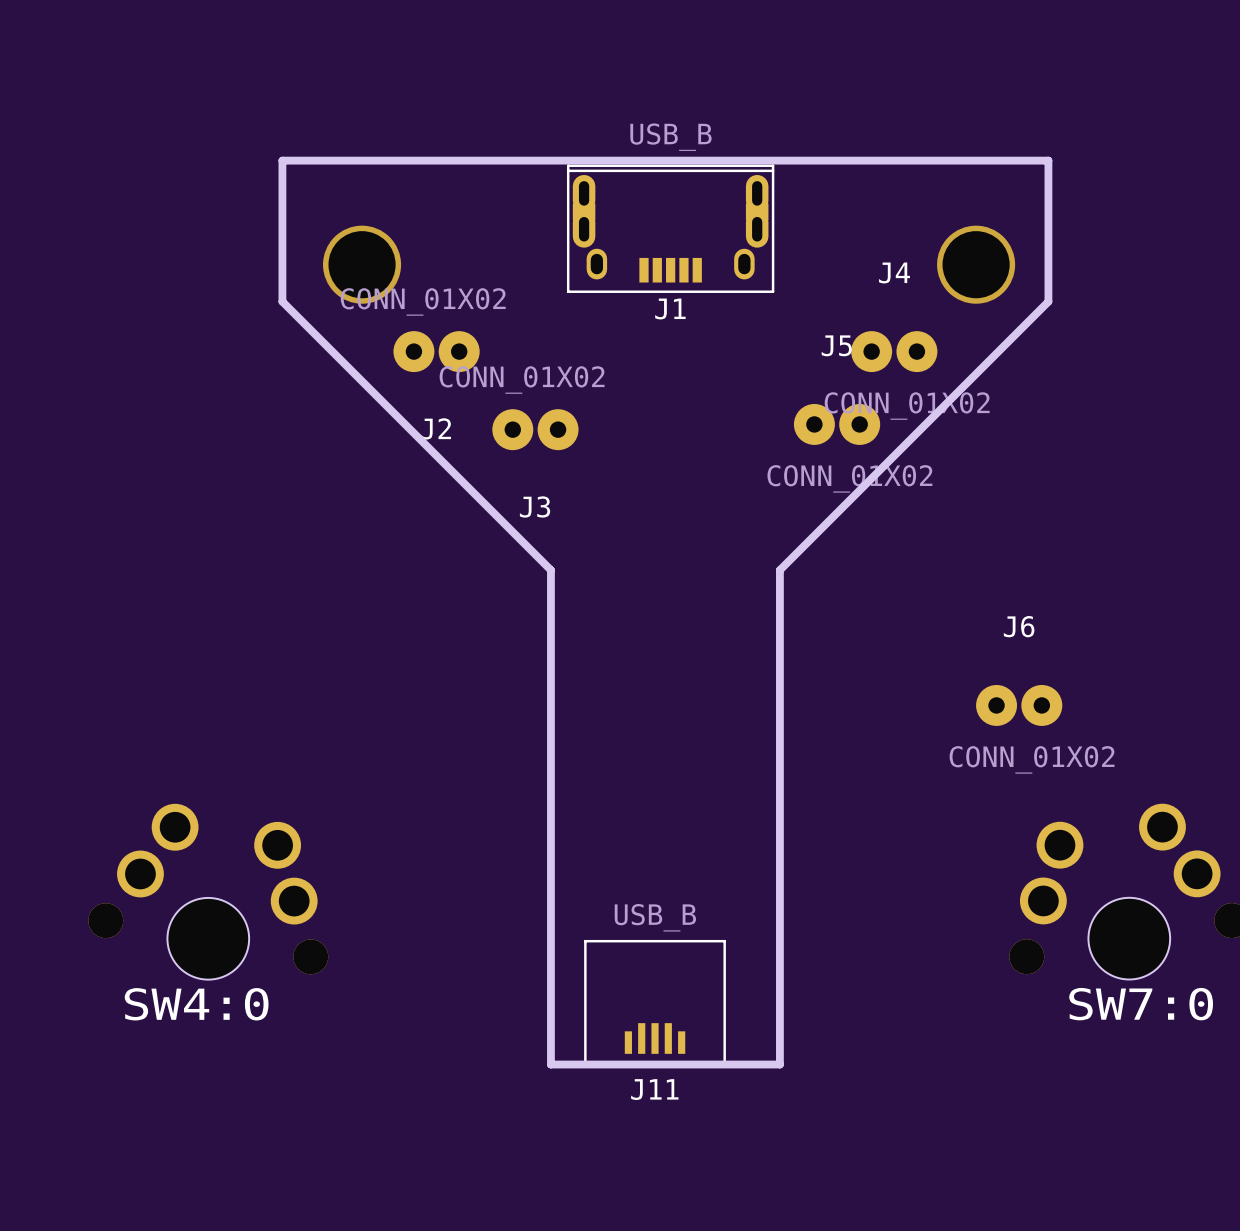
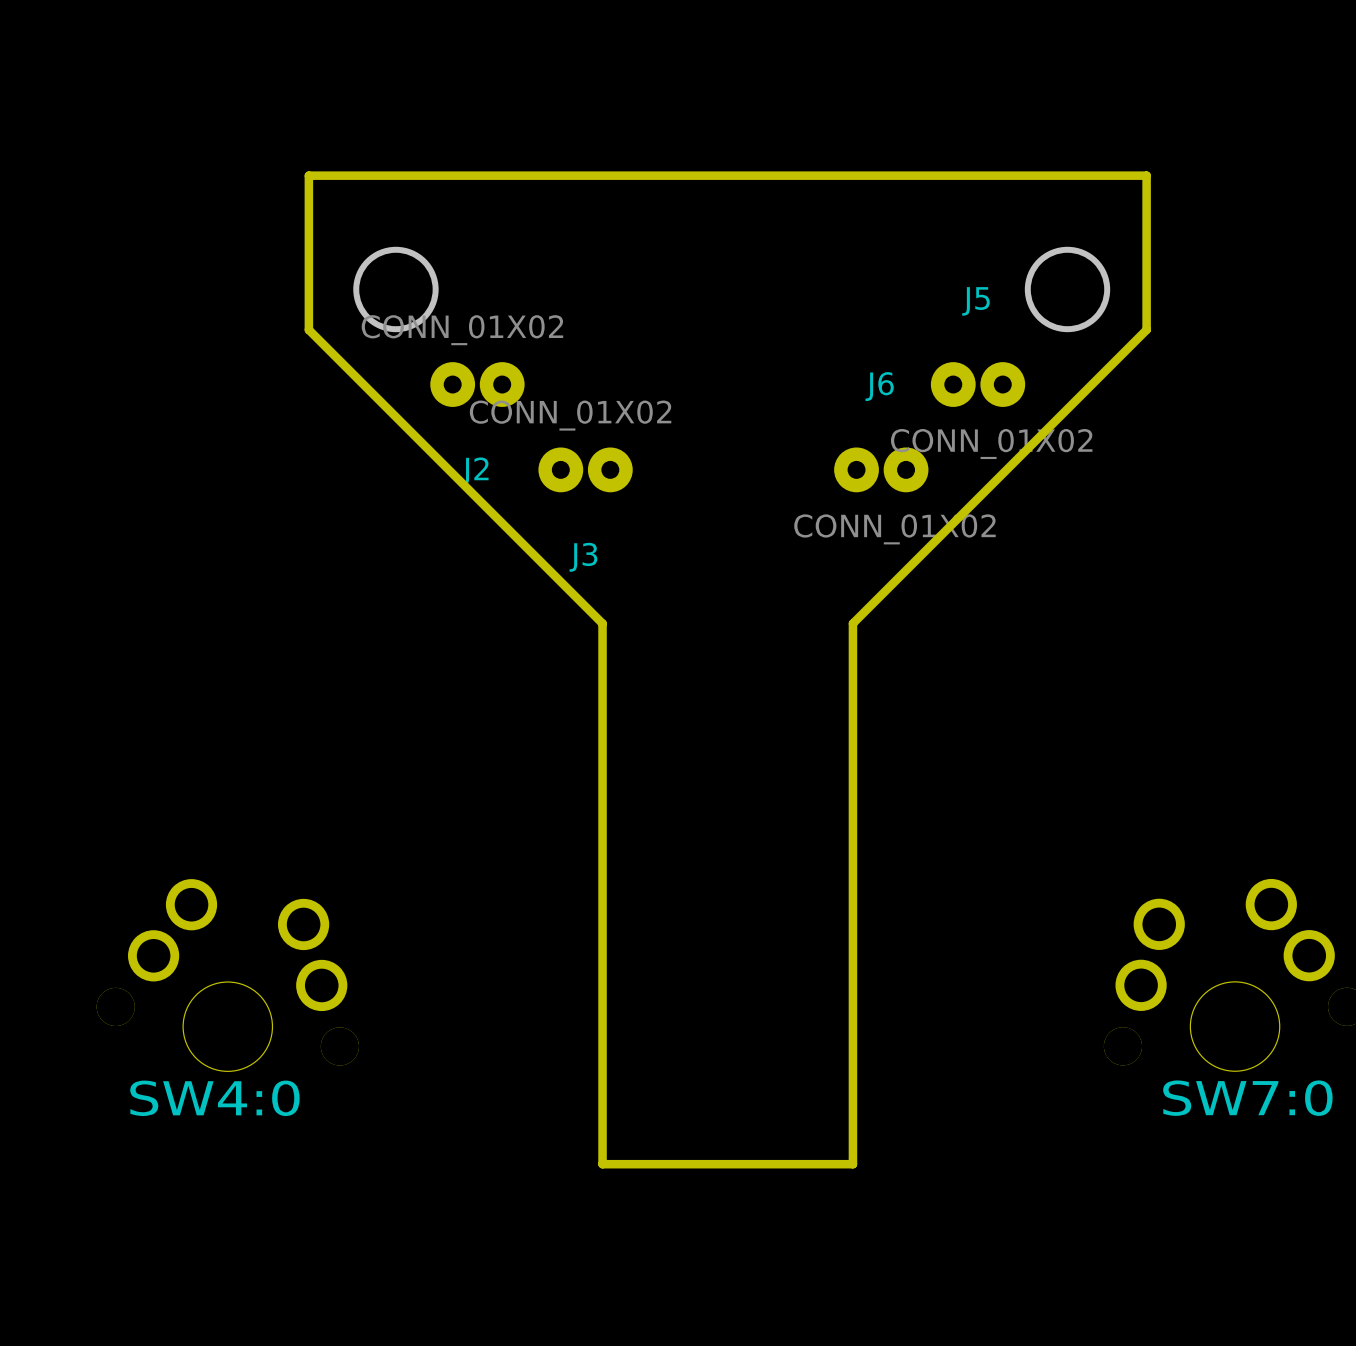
J1: USB_B (670, 228) -> none
J4 name: J4 (894, 272) -> J5 (976, 301)
J5: CONN_01X02 (837, 424) -> none
J6 position: (1019, 705) -> (881, 469)
J11: USB_B (655, 1002) -> none

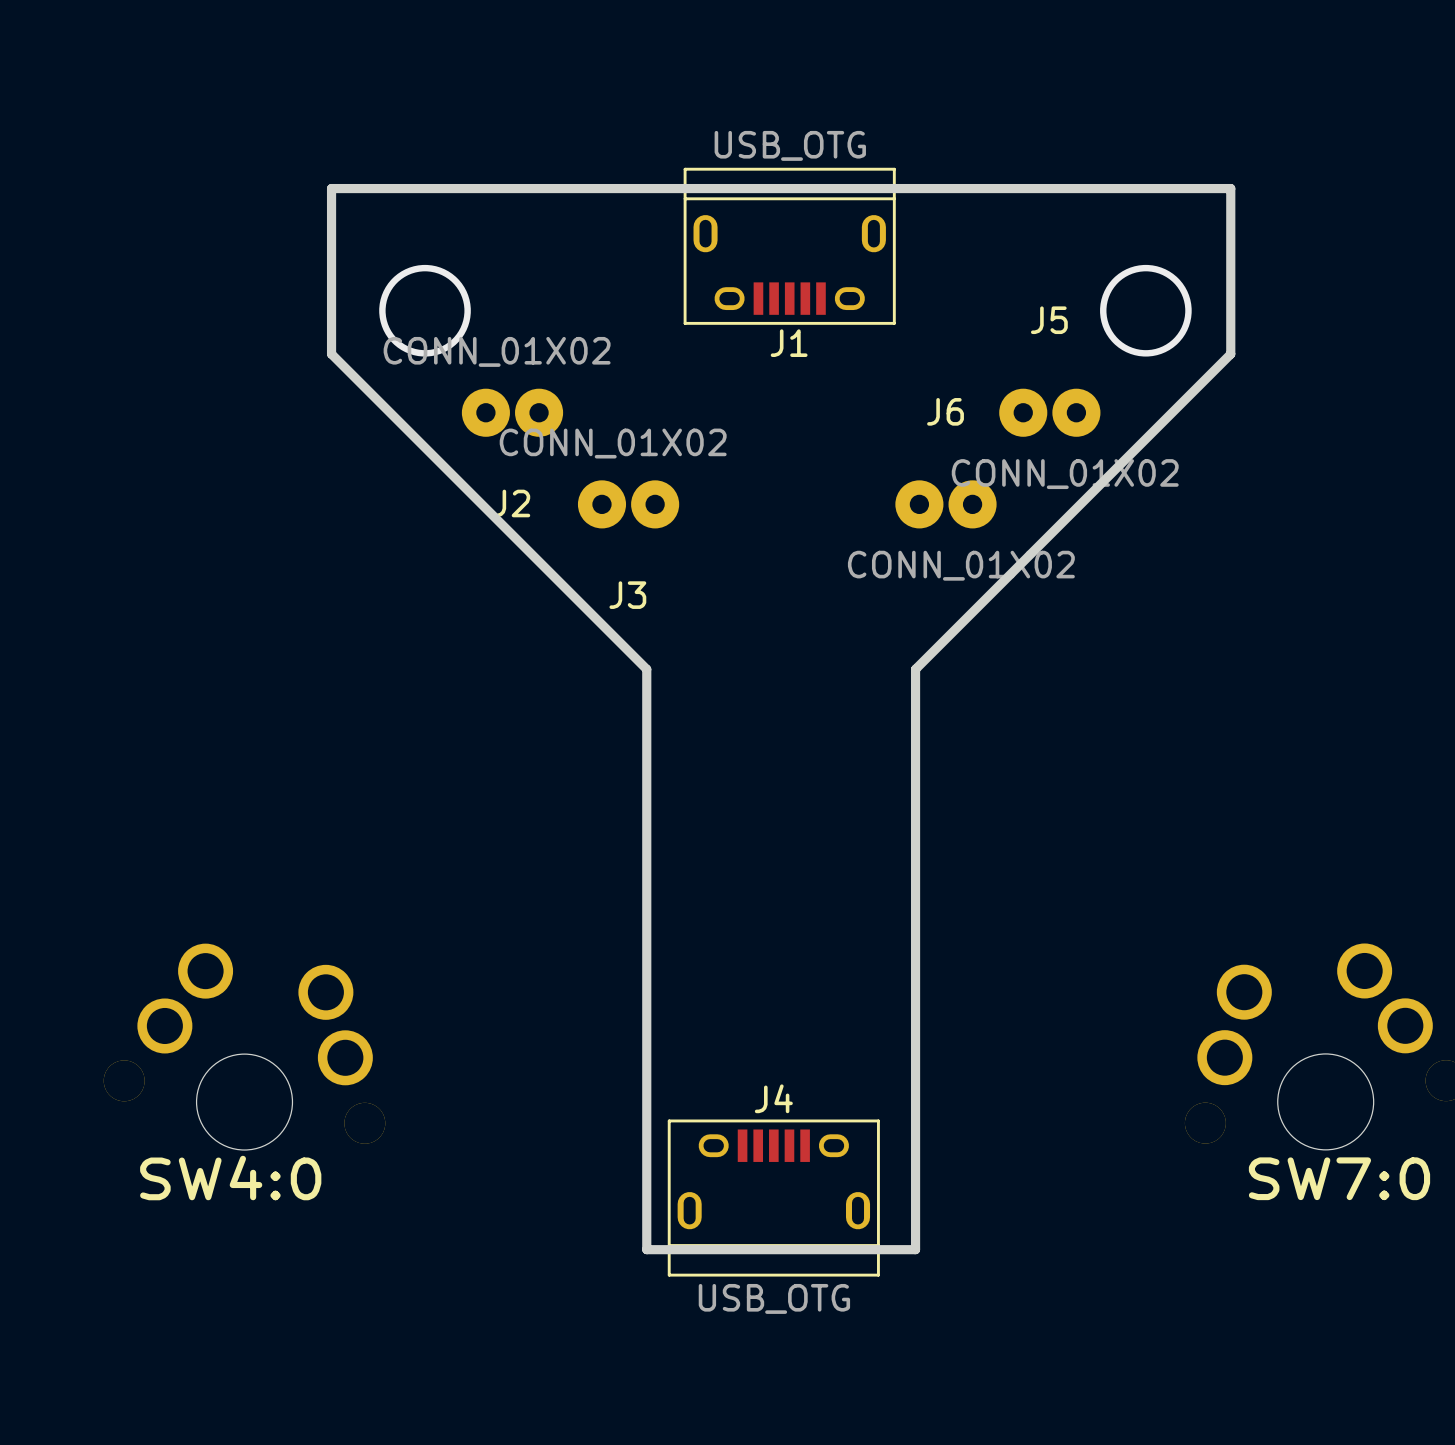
J1: none -> USB_OTG (789, 246)
J4: none -> USB_OTG (773, 1198)

